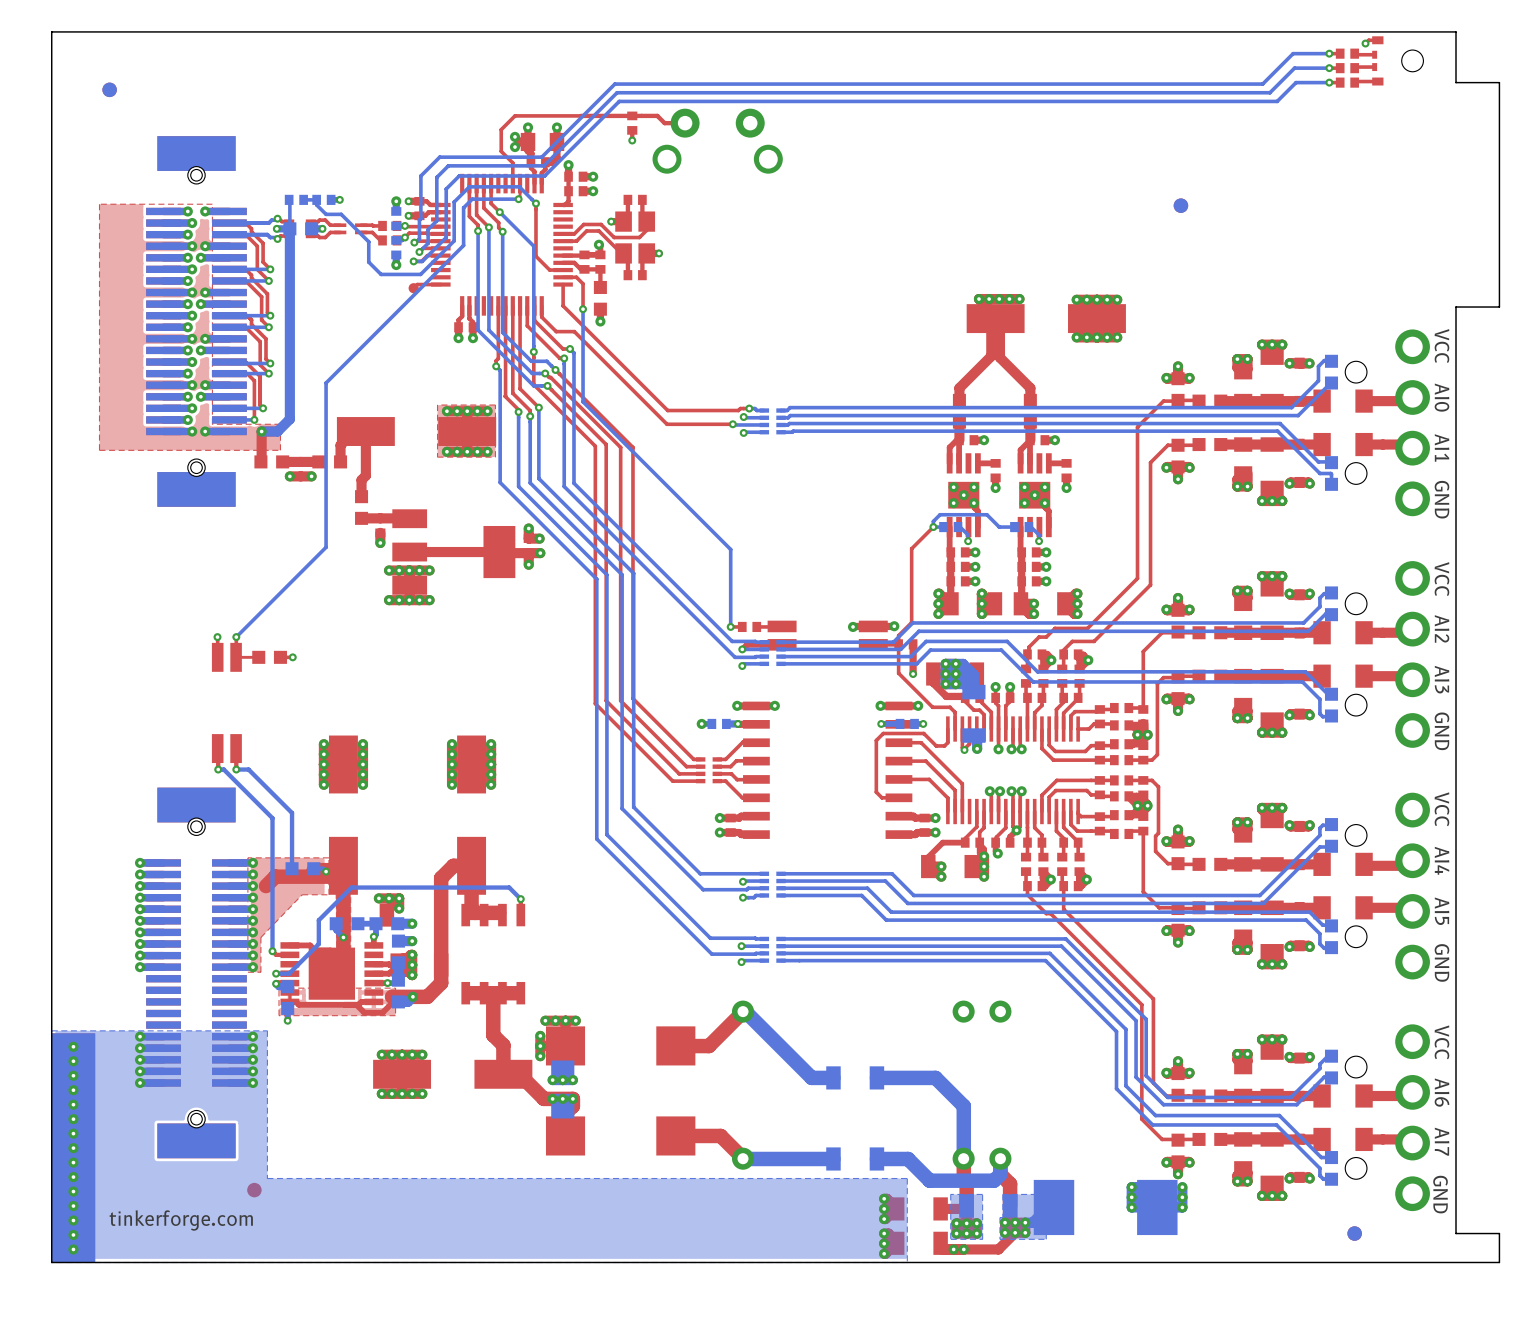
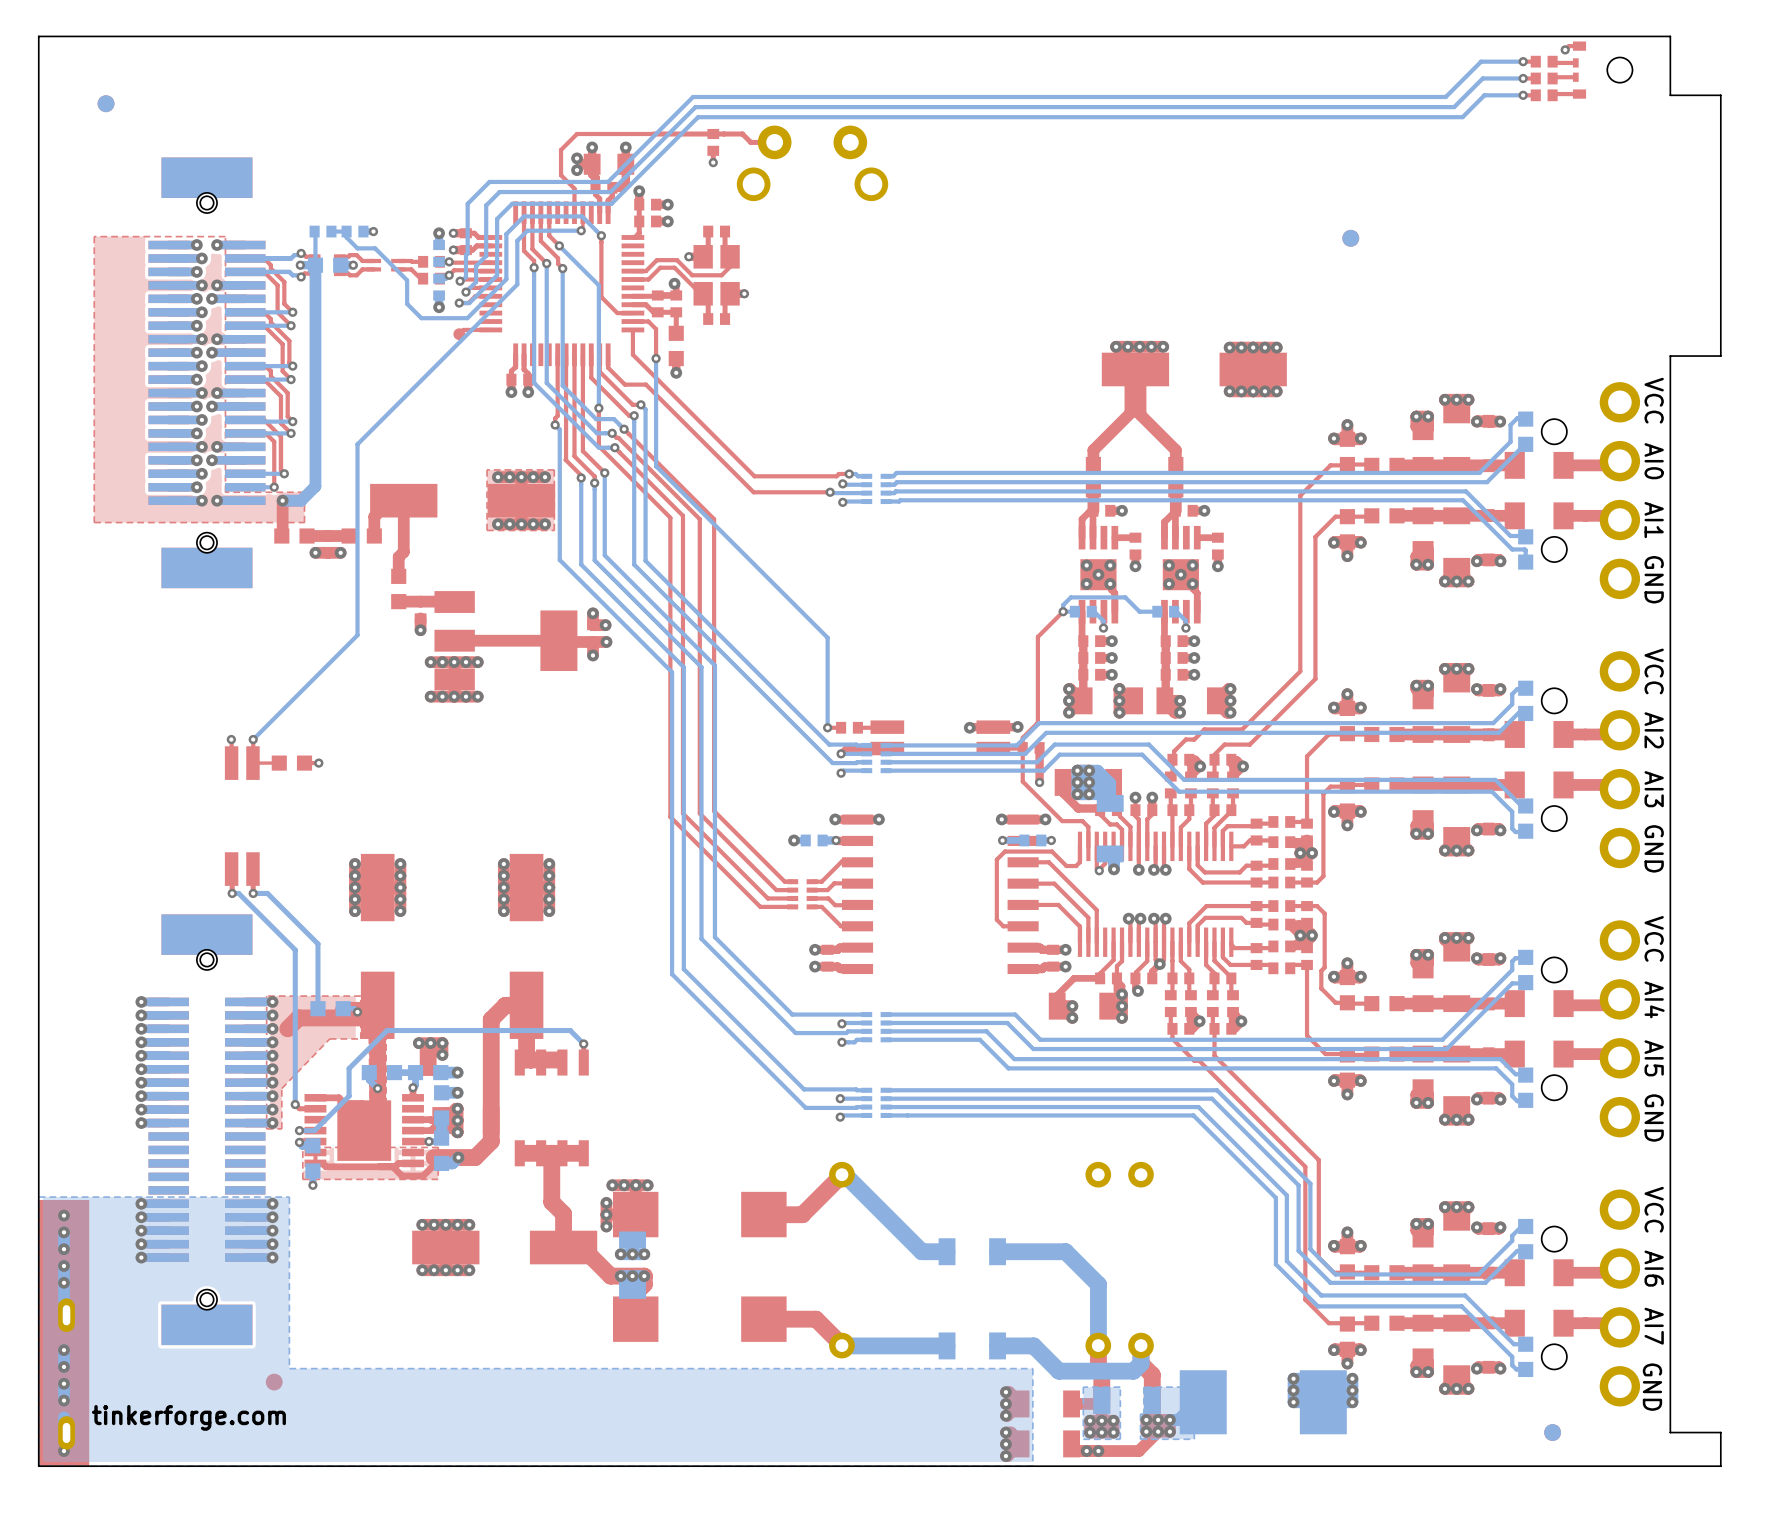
part footprint: [51, 1033, 96, 1263] -> [38, 1200, 90, 1467]
via: (73, 1119) -> none
via: (73, 1133) -> none
via: (73, 1148) -> none
via: (73, 1220) -> none
via: (73, 1234) -> none

